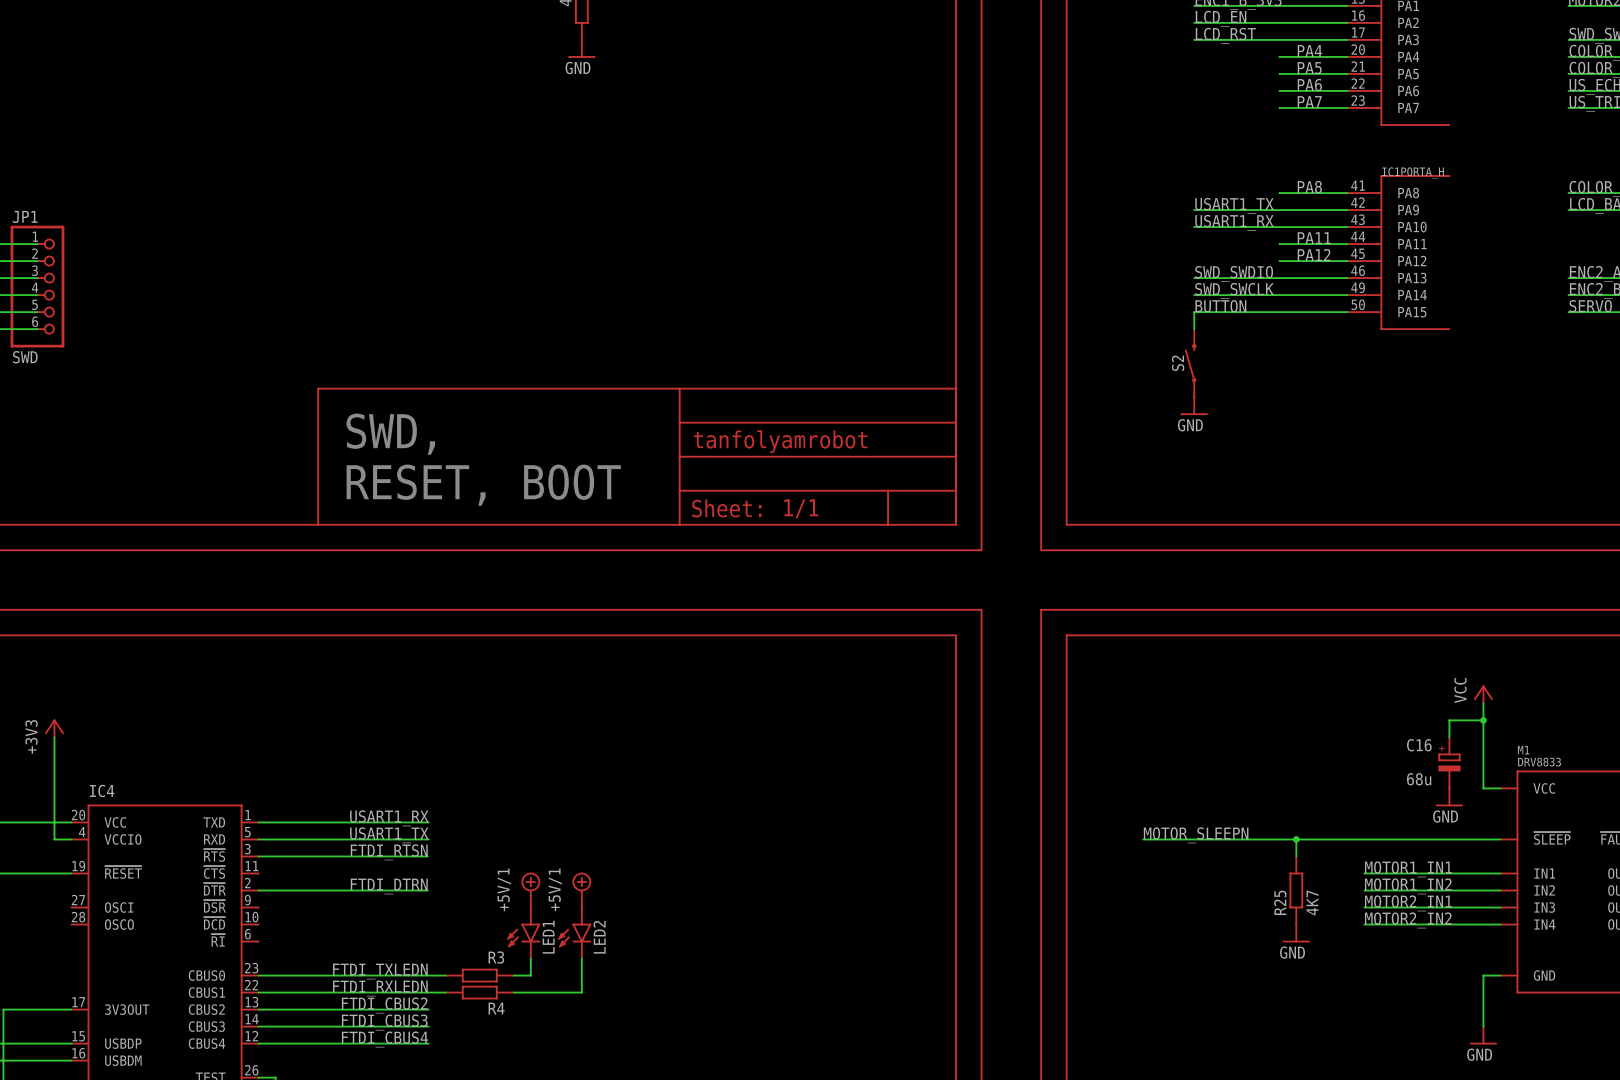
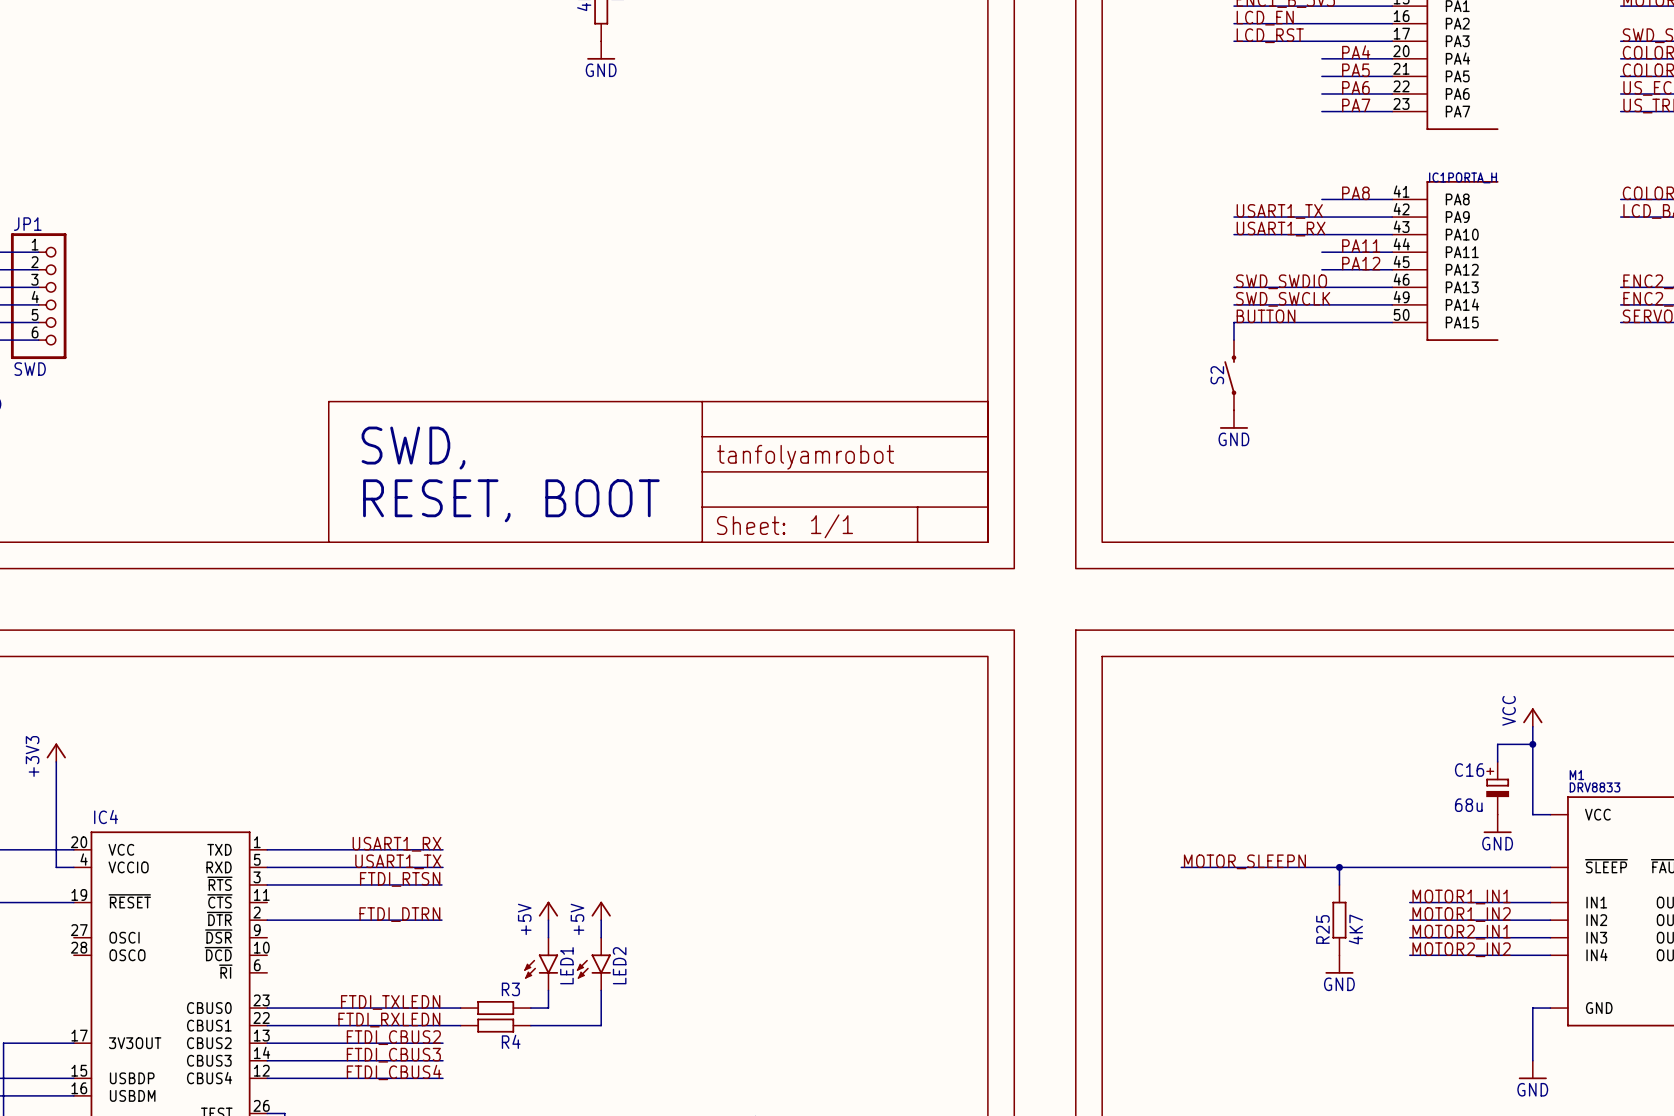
power symbol: none -> +5V (548, 910)
power symbol: none -> +5V (601, 910)
power symbol: +5V/1 (530, 890) -> none
power symbol: +5V/1 (581, 890) -> none

